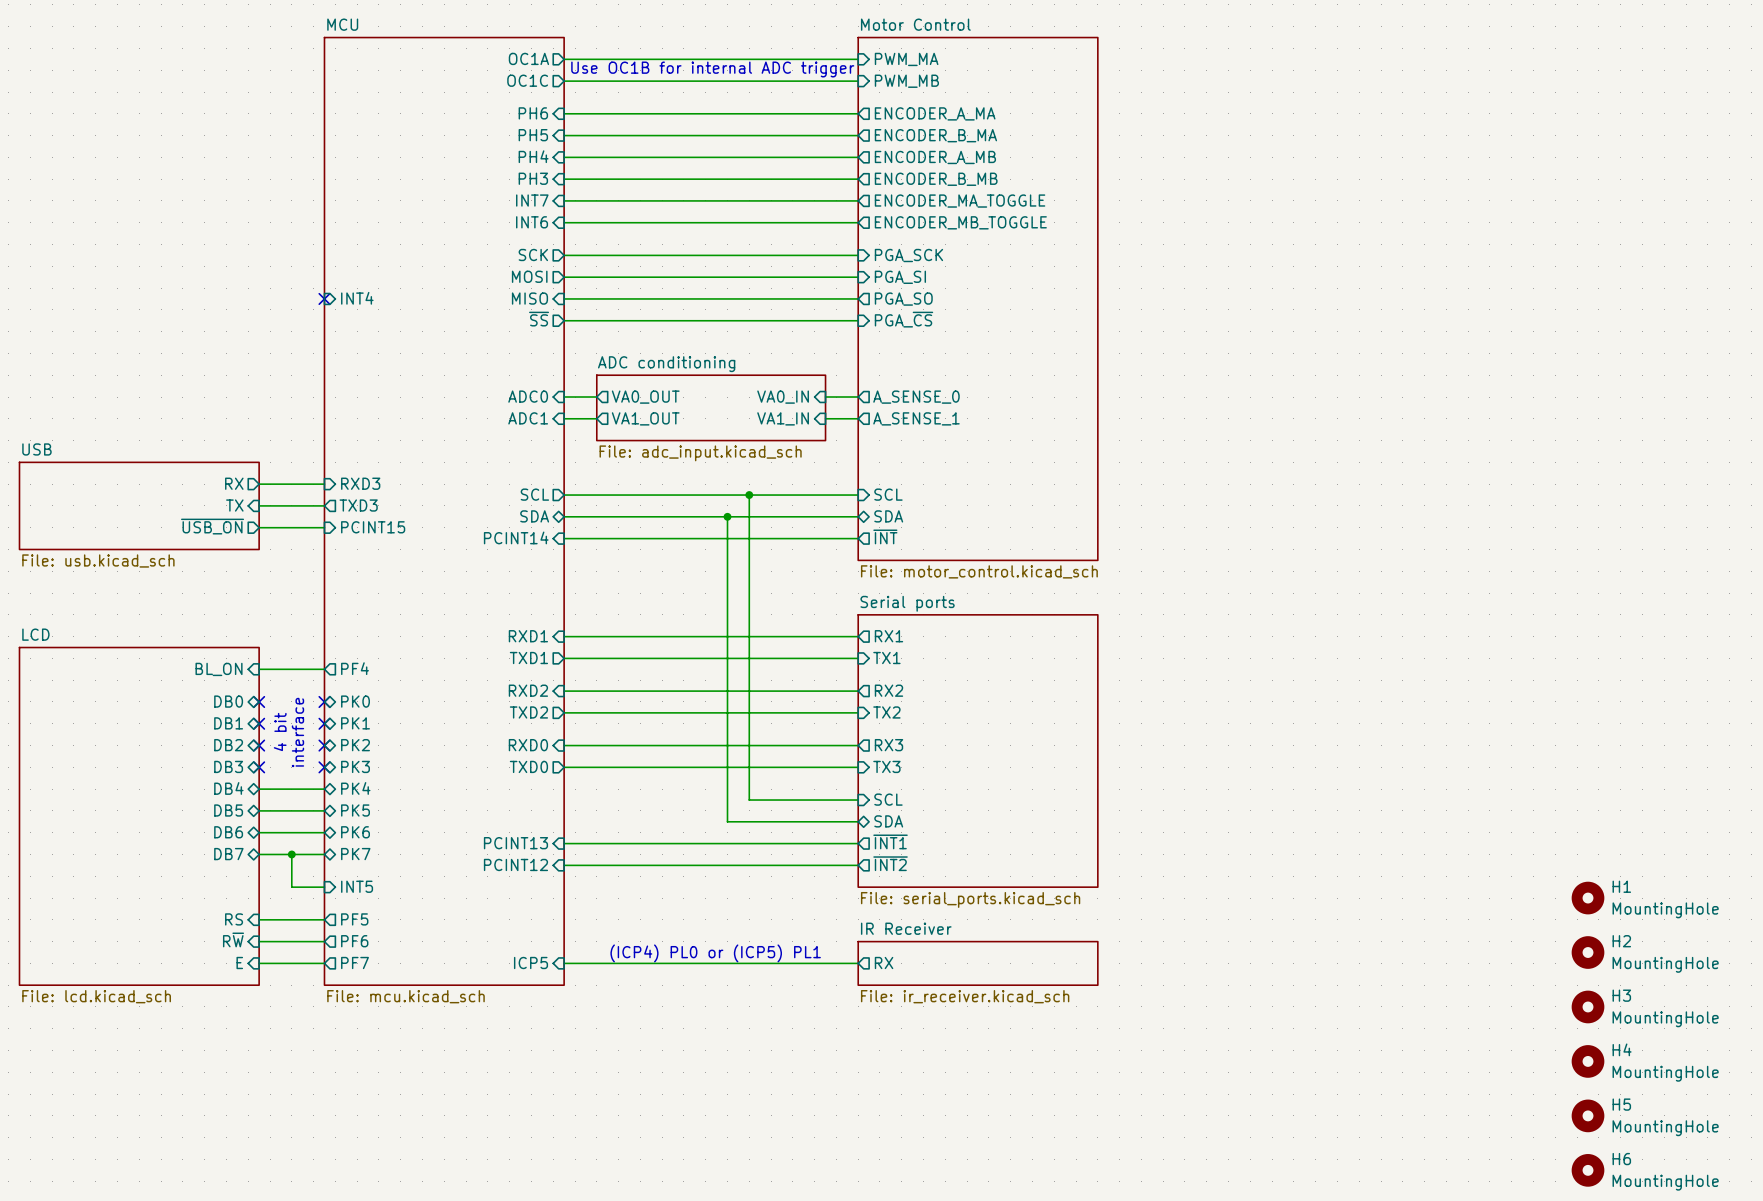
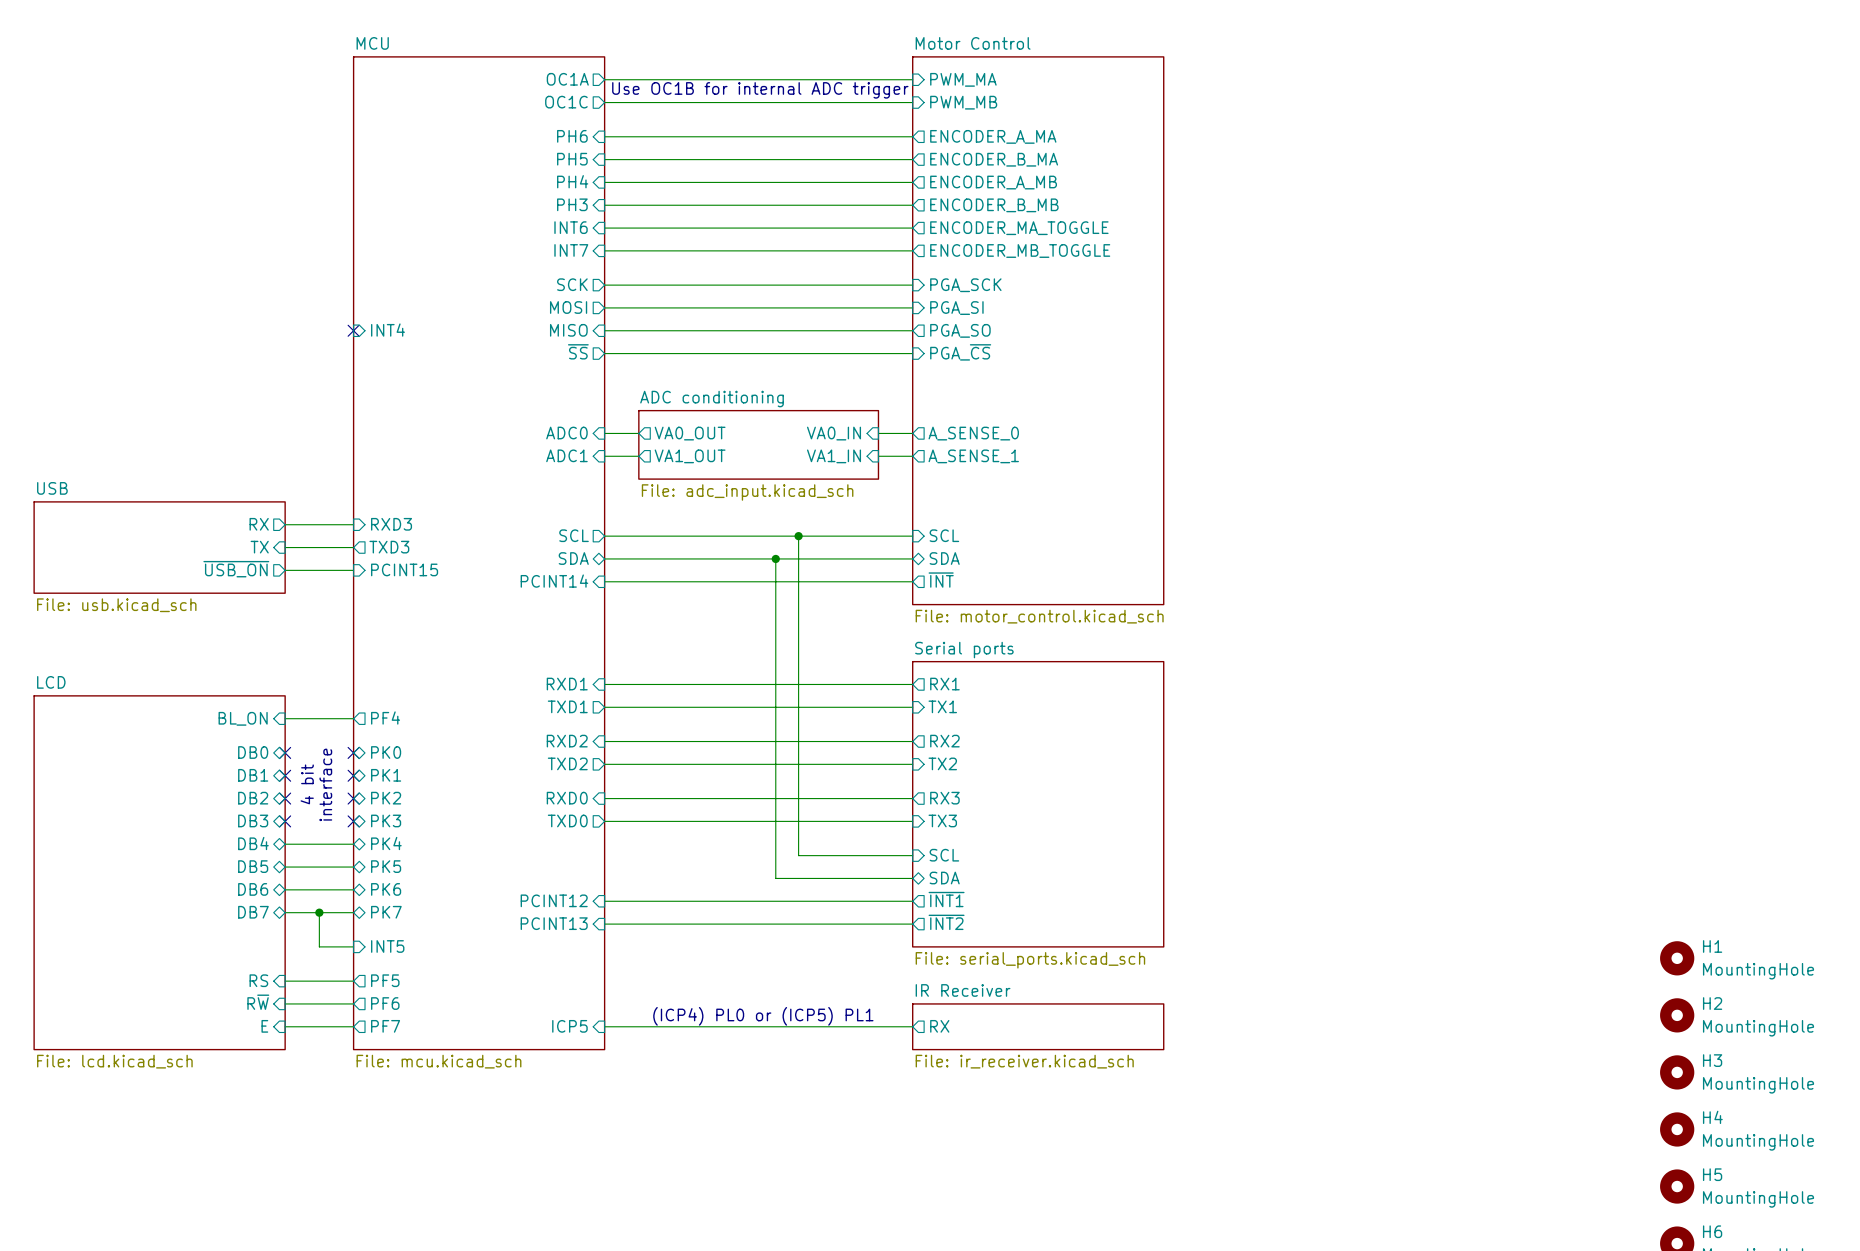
sheet pin: INT7 (532, 200) -> INT6 (571, 227)
sheet pin: INT6 (532, 222) -> INT7 (571, 250)
sheet pin: PCINT13 (515, 843) -> PCINT12 (554, 900)
sheet pin: PCINT12 (515, 864) -> PCINT13 (554, 923)

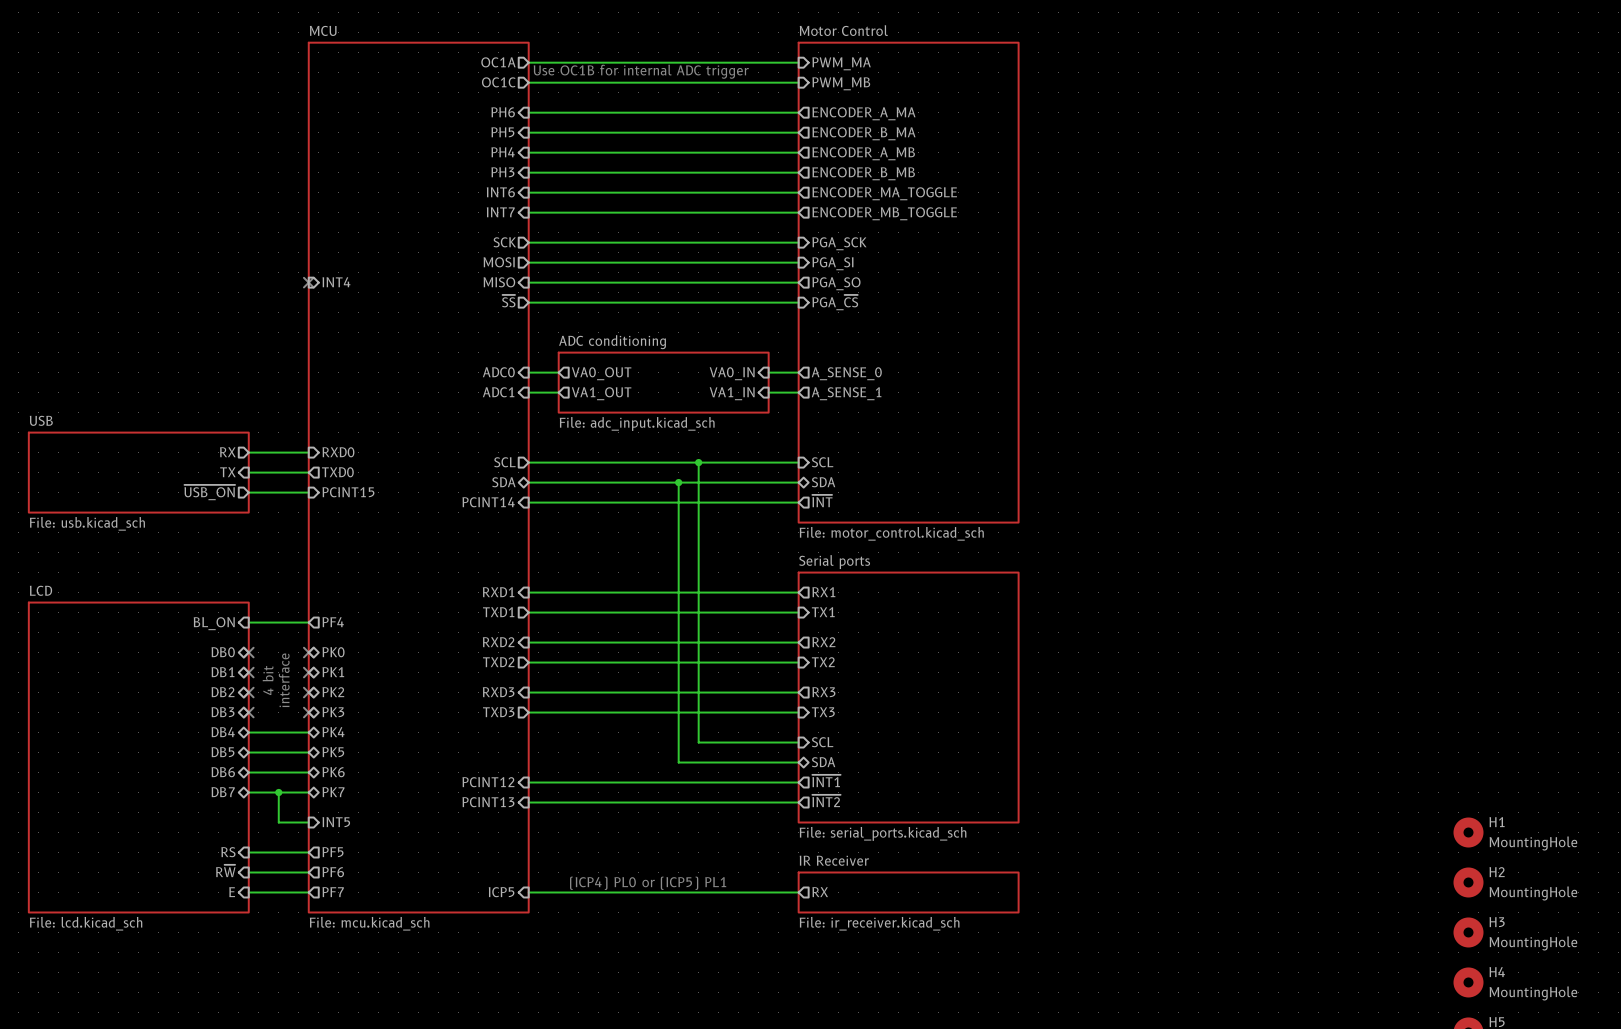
sheet pin: RXD3 (391, 524) -> RXD0 (338, 452)
sheet pin: TXD3 (389, 547) -> TXD0 (337, 472)
sheet pin: RXD0 (567, 798) -> RXD3 (498, 692)
sheet pin: TXD0 (567, 820) -> TXD3 (498, 712)

